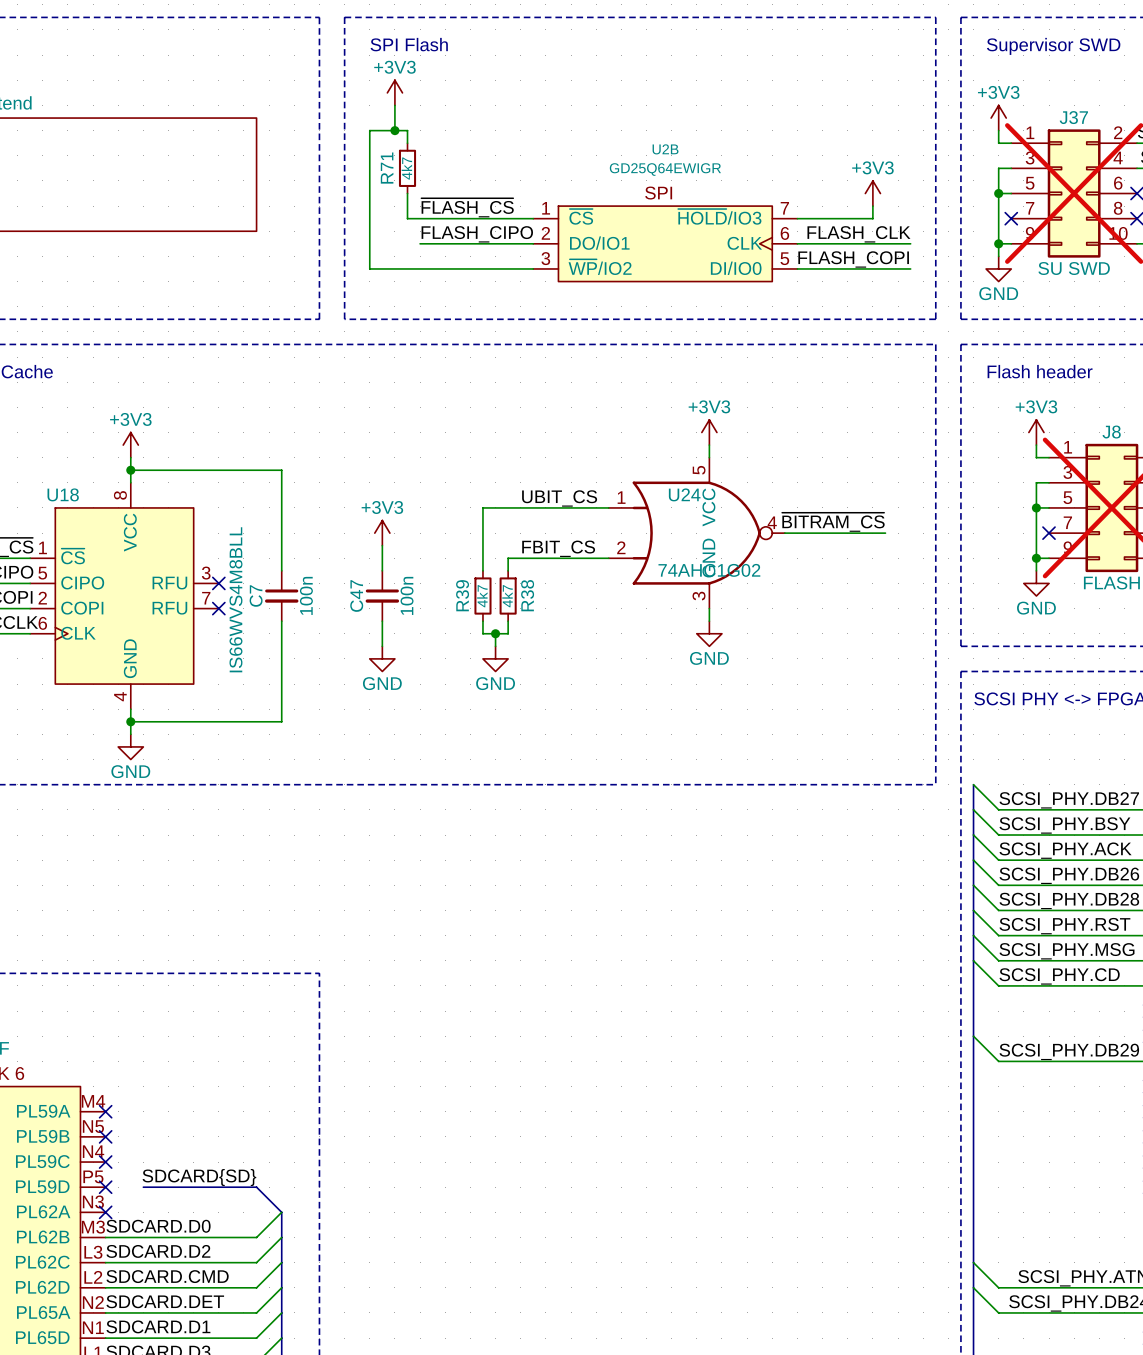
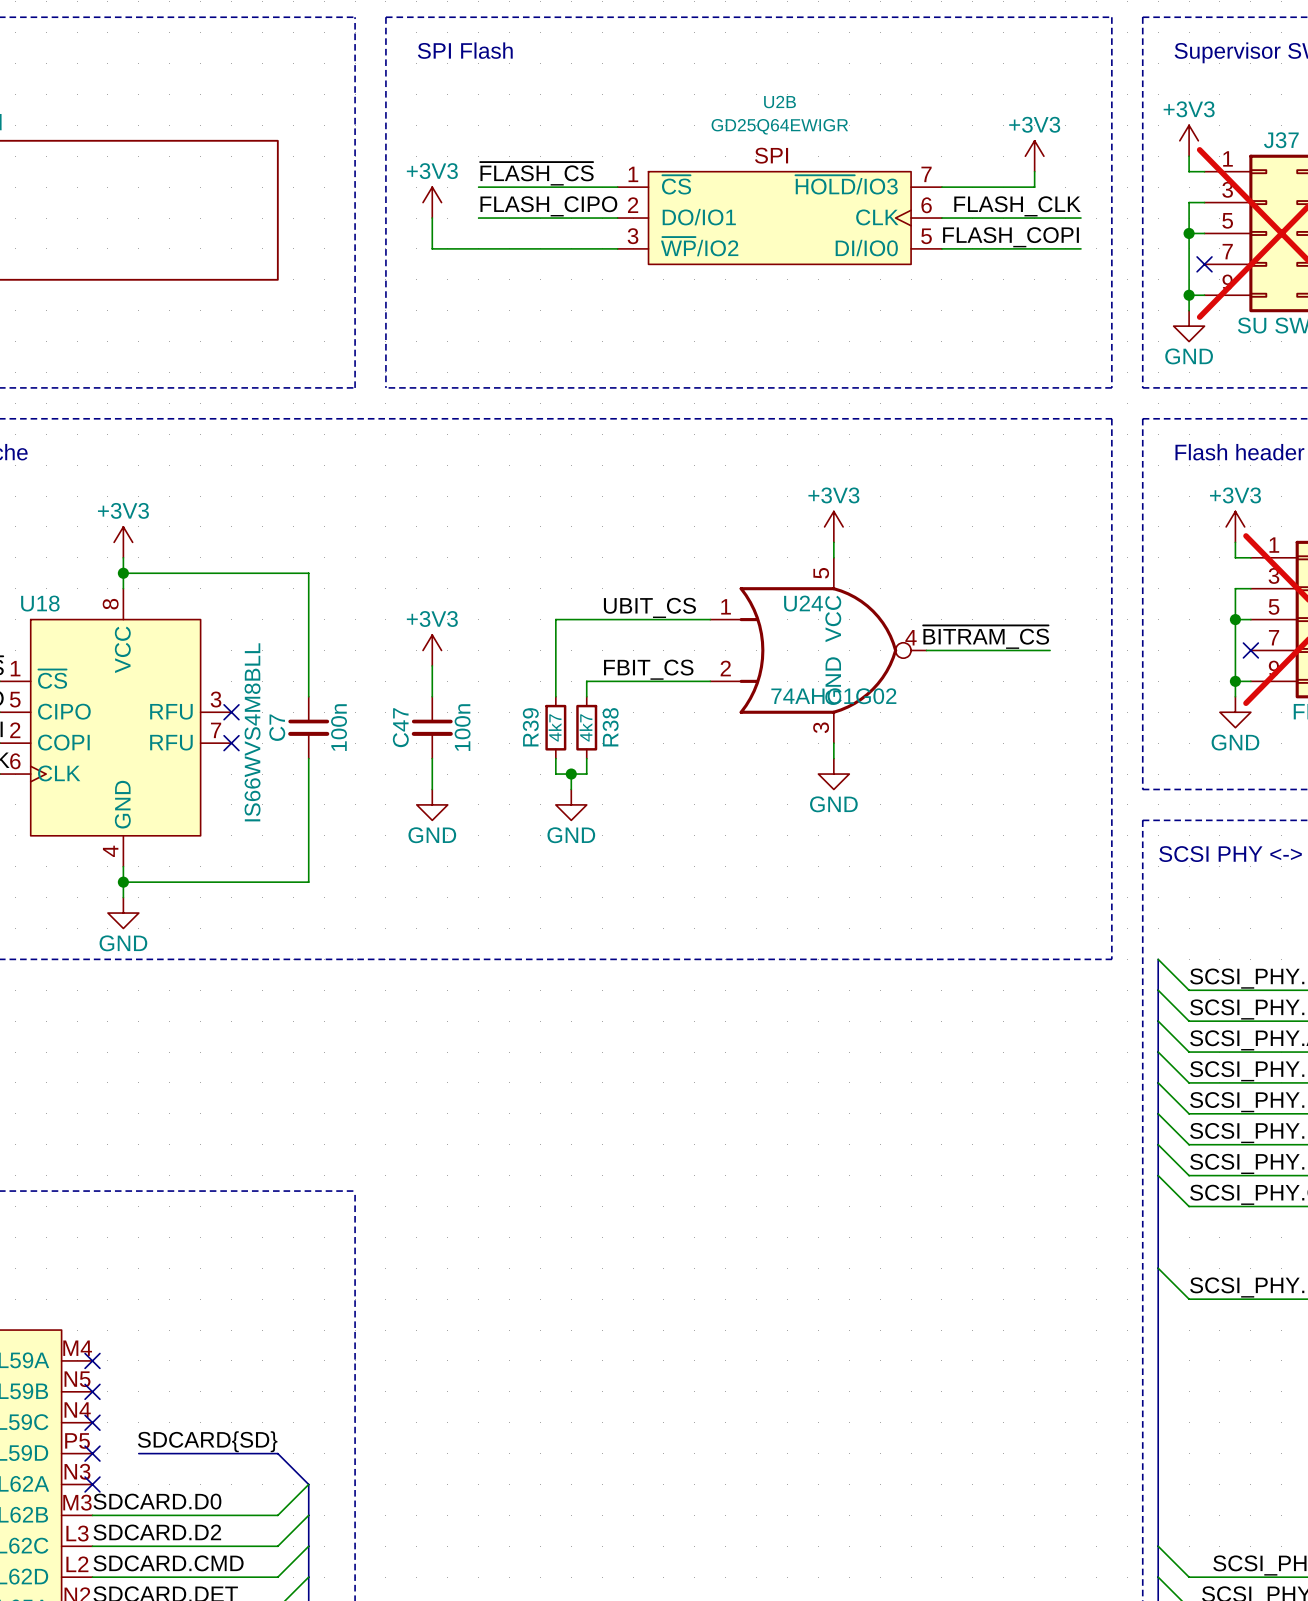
power symbol position: +3V3 (394, 92) -> +3V3 (432, 202)
wire: (394, 105) (394, 130) -> none
junction: (394, 130) -> none
wire: (407, 143) (407, 130) (369, 130) (369, 268) (533, 268) -> none
wire: none -> (478, 187) (617, 187)
R71: 4k7 (407, 168) -> none
wire: none -> (432, 218) (432, 248) (617, 248)
wire: (407, 193) (407, 218) (533, 218) -> none
power symbol position: +3V3 (872, 193) -> +3V3 (1034, 156)
wire: (872, 206) (872, 218) (797, 218) -> (1034, 171) (1034, 187) (941, 187)
label position: ~{FLASH_CS} (467, 207) -> ~{FLASH_CS} (536, 173)
label position: FLASH_CIPO (477, 234) -> FLASH_CIPO (548, 206)
label position: FLASH_CLK (858, 234) -> FLASH_CLK (1017, 206)
wire: (420, 243) (533, 243) -> (478, 218) (617, 218)
U2B position: (665, 243) -> (779, 218)
wire: (797, 243) (910, 243) -> (941, 218) (1080, 218)
label position: FLASH_COPI (853, 259) -> FLASH_COPI (1010, 237)
wire: (797, 268) (910, 268) -> (941, 248) (1080, 248)

